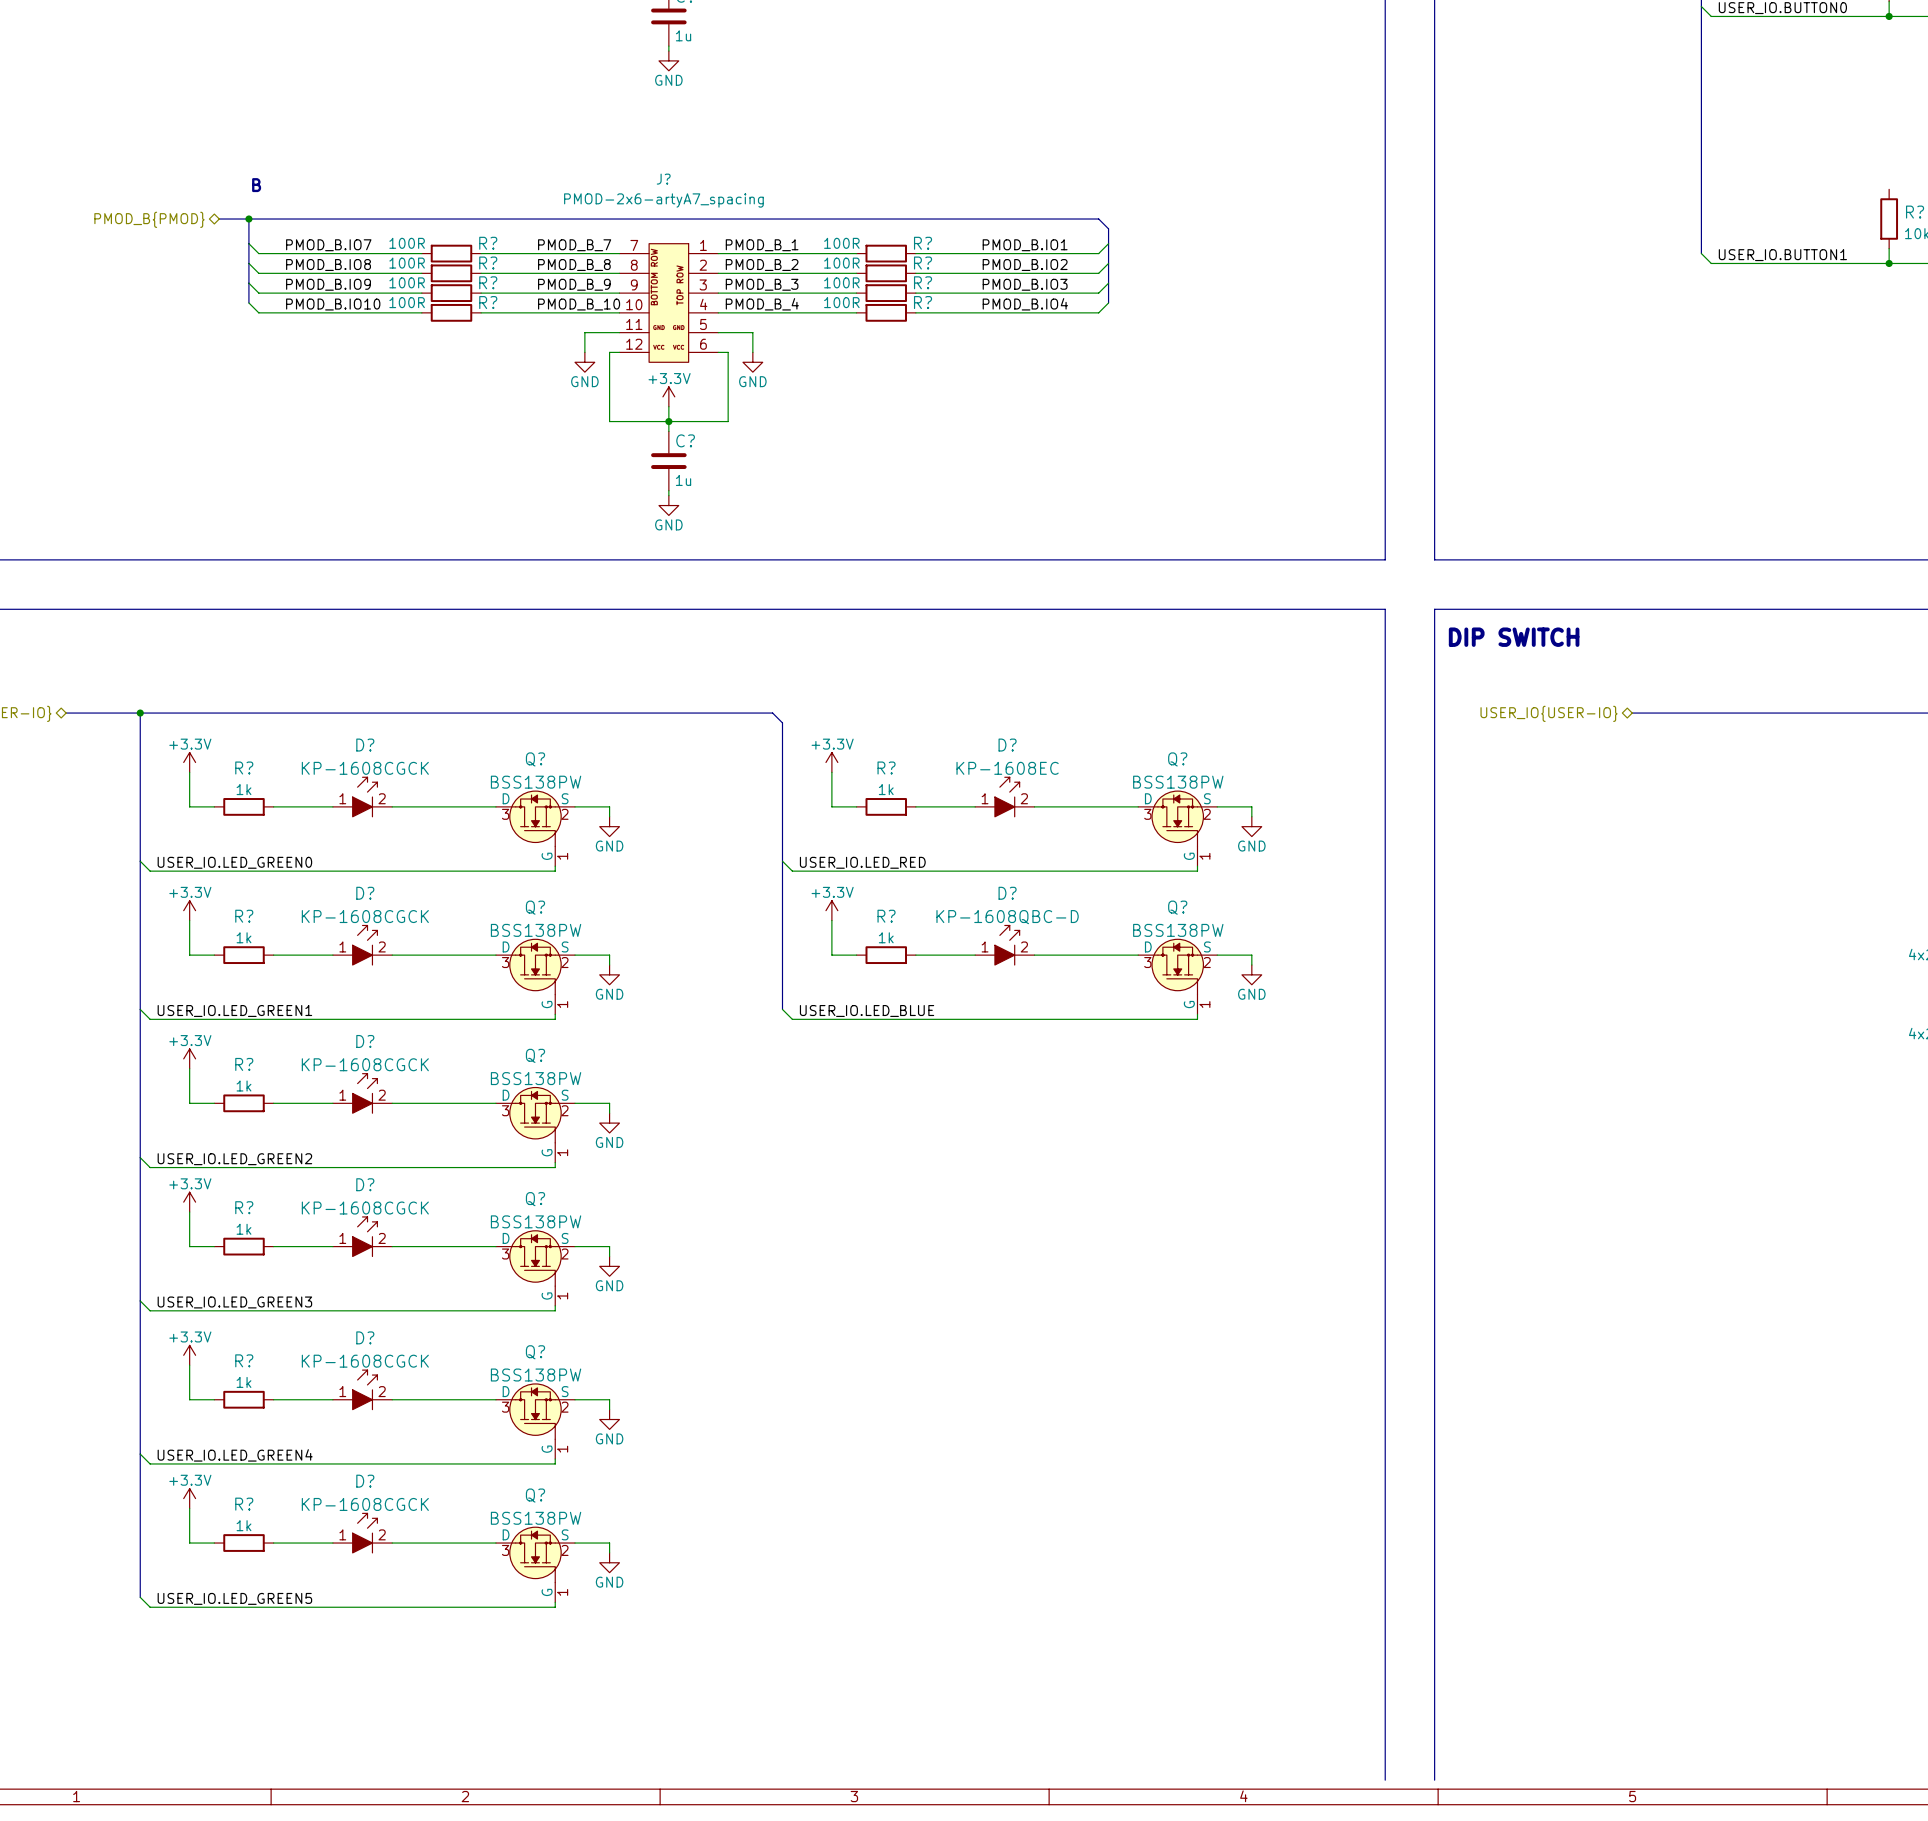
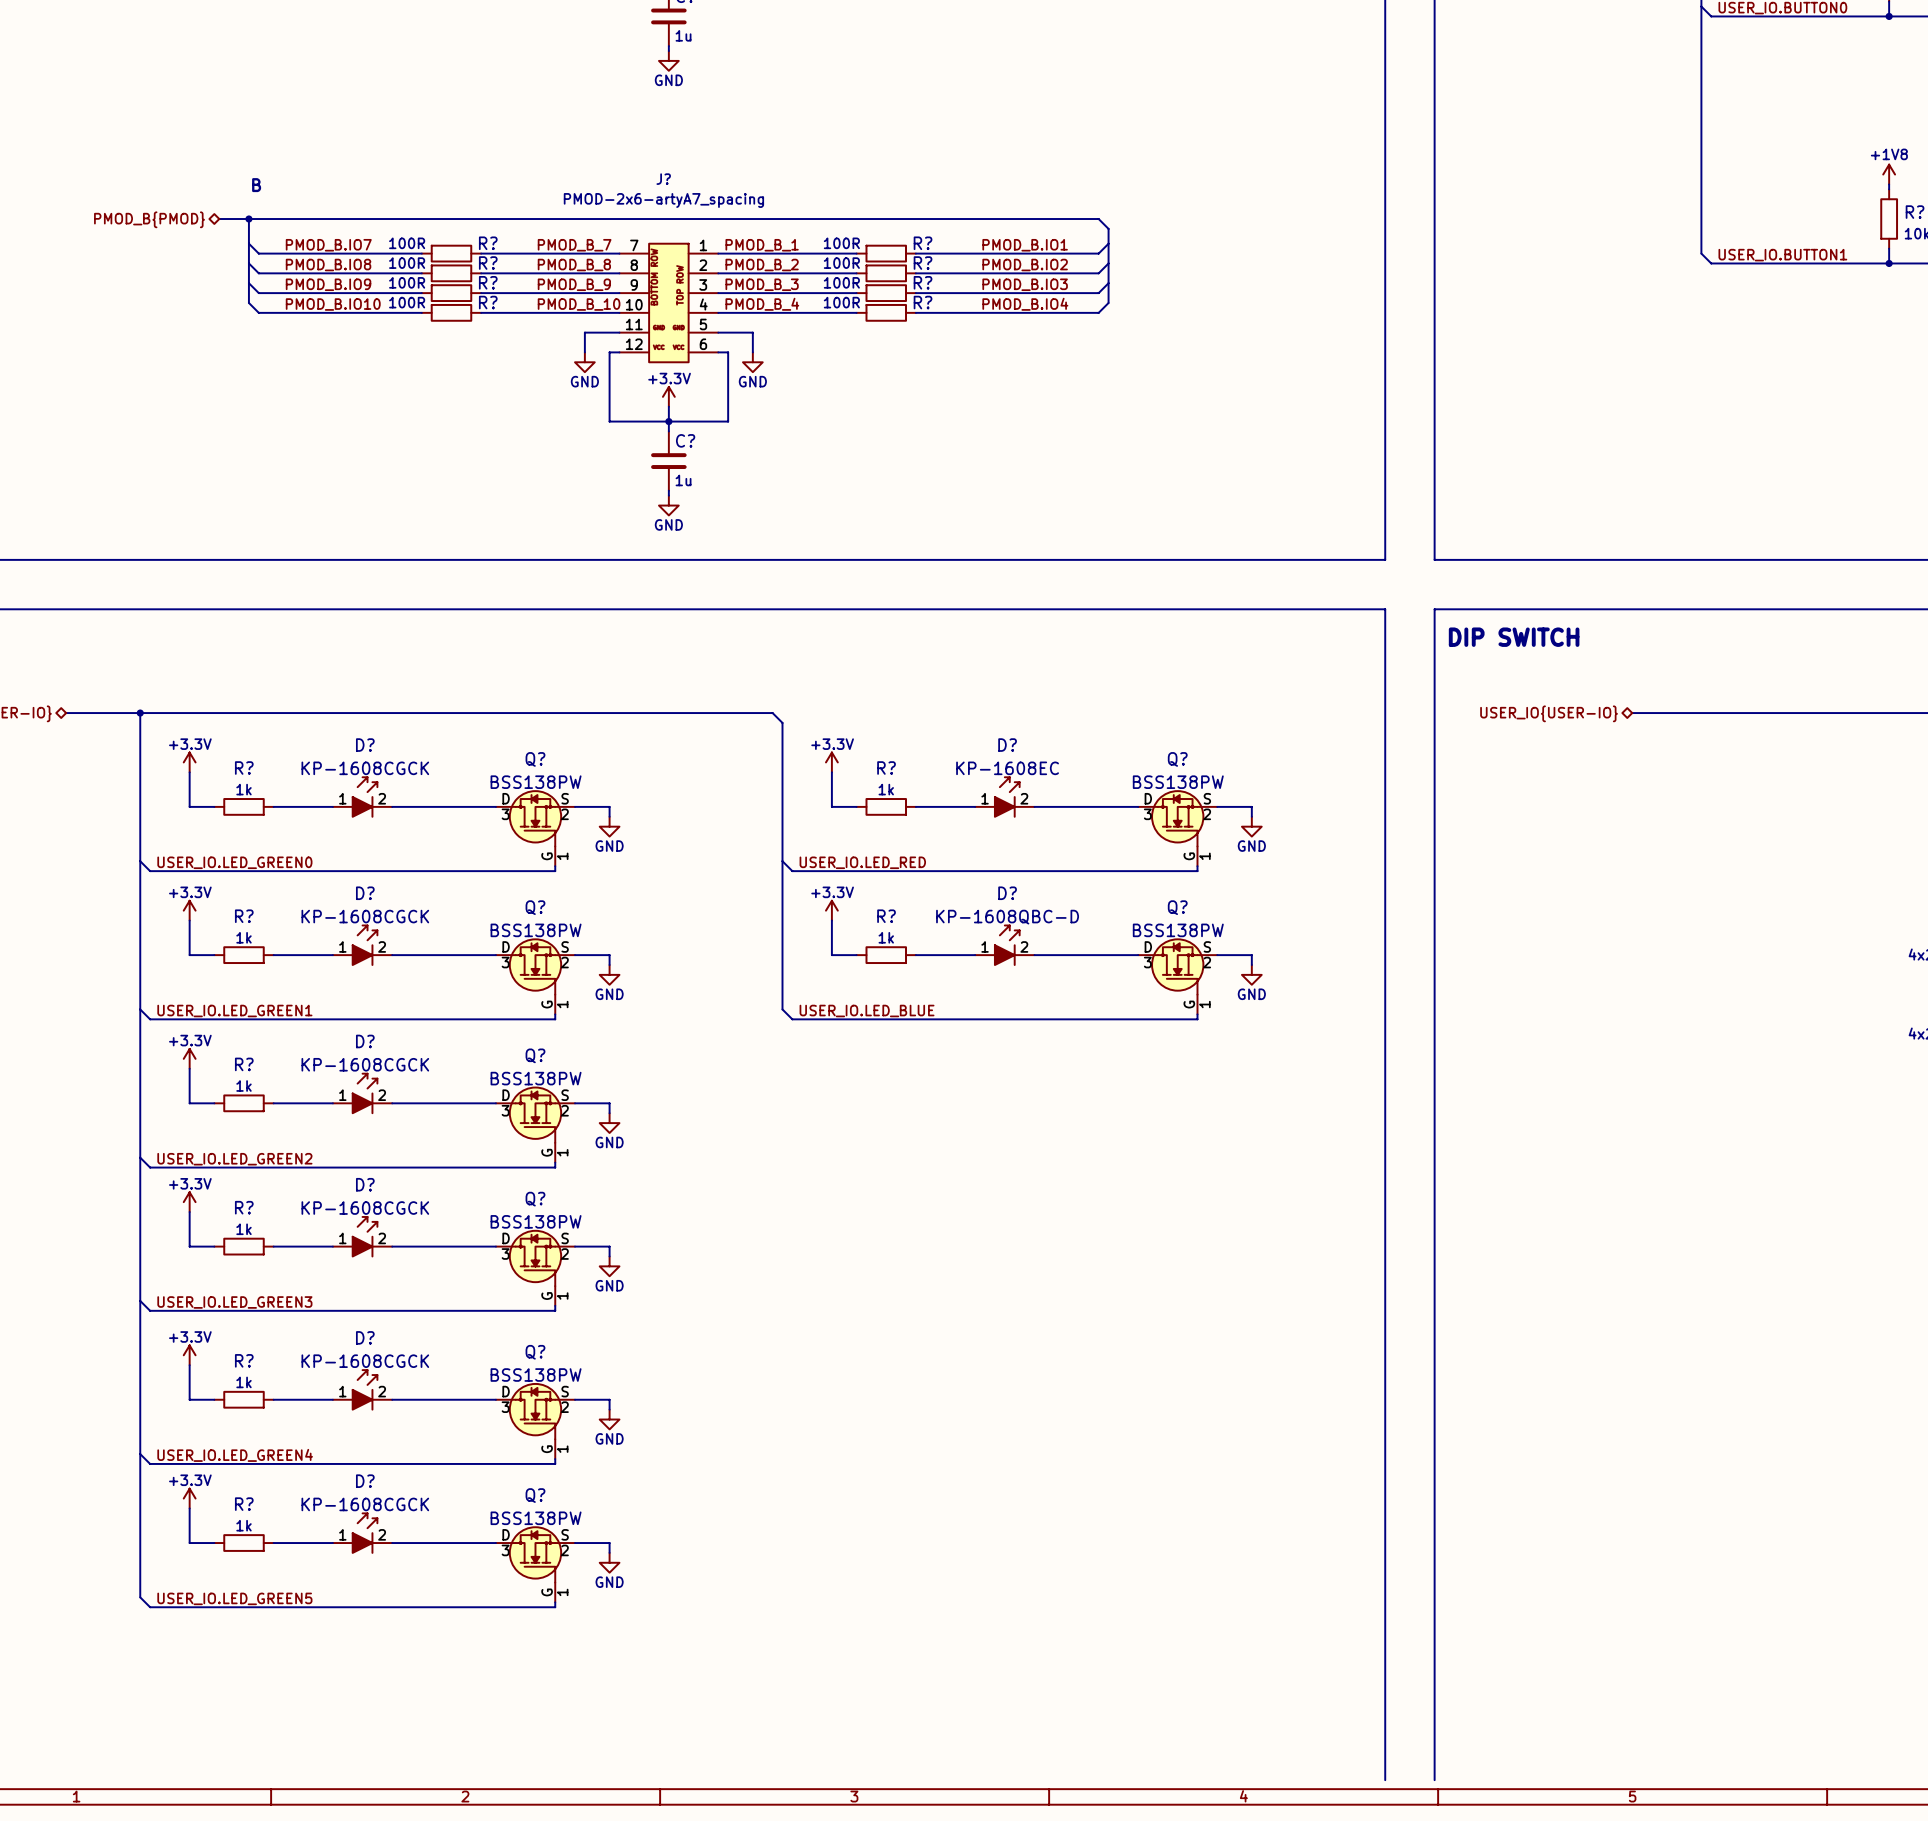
power symbol: none -> +1V8 (1889, 174)
wire: none -> (1889, 184) (1889, 189)

